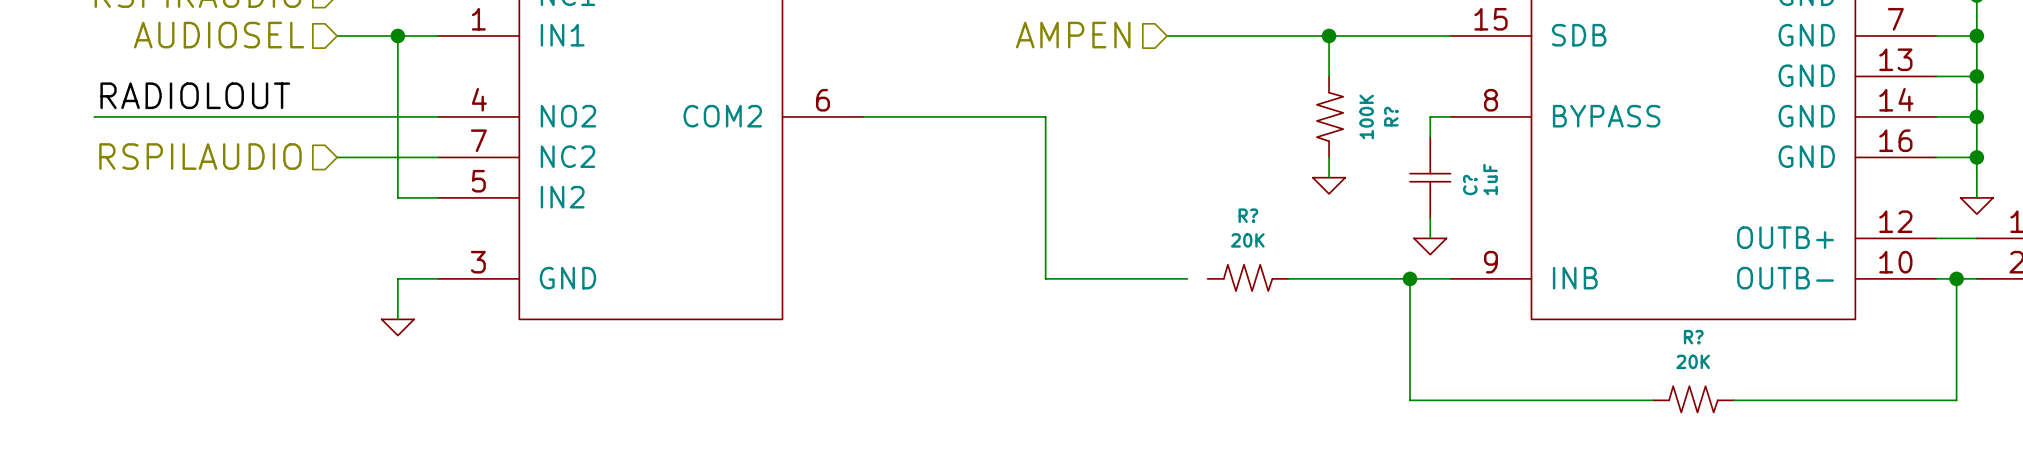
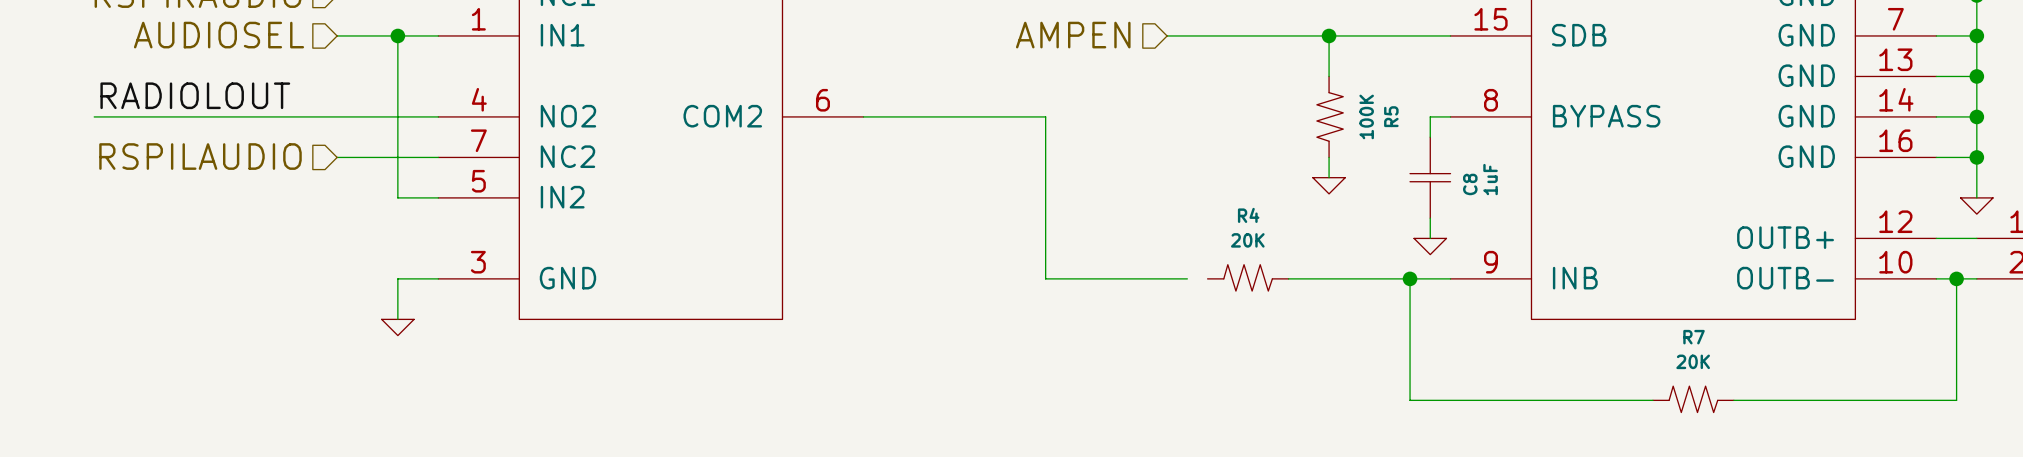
R? name: R? (1391, 116) -> R5 (1391, 116)
C? name: C? (1470, 185) -> C8 (1470, 184)
R? name: R? (1248, 215) -> R4 (1248, 215)
R? name: R? (1693, 337) -> R7 (1694, 337)

